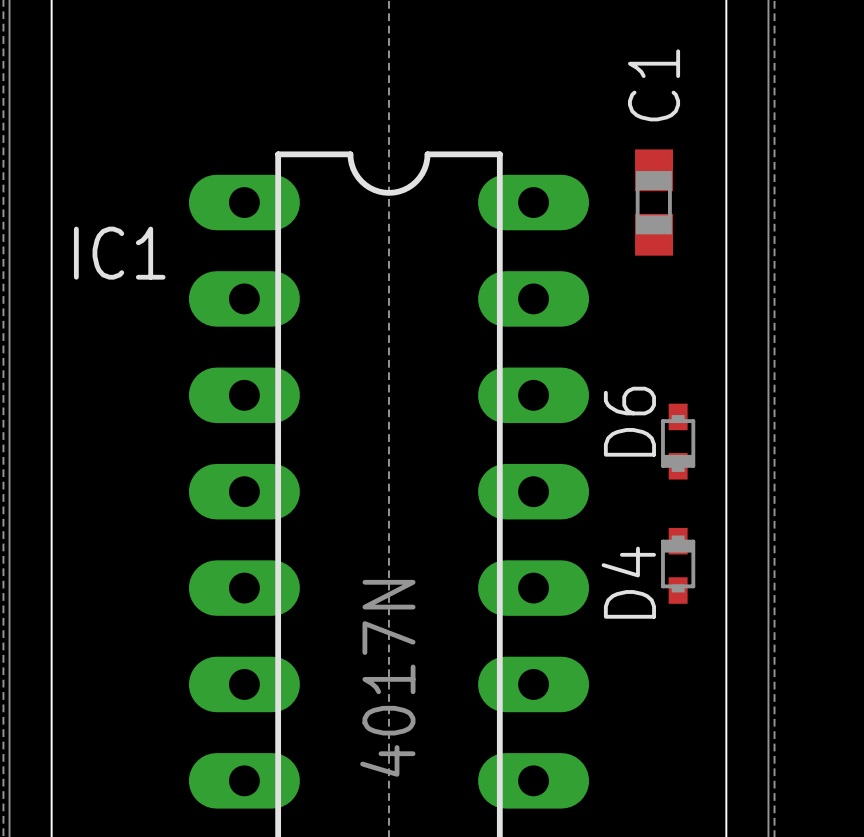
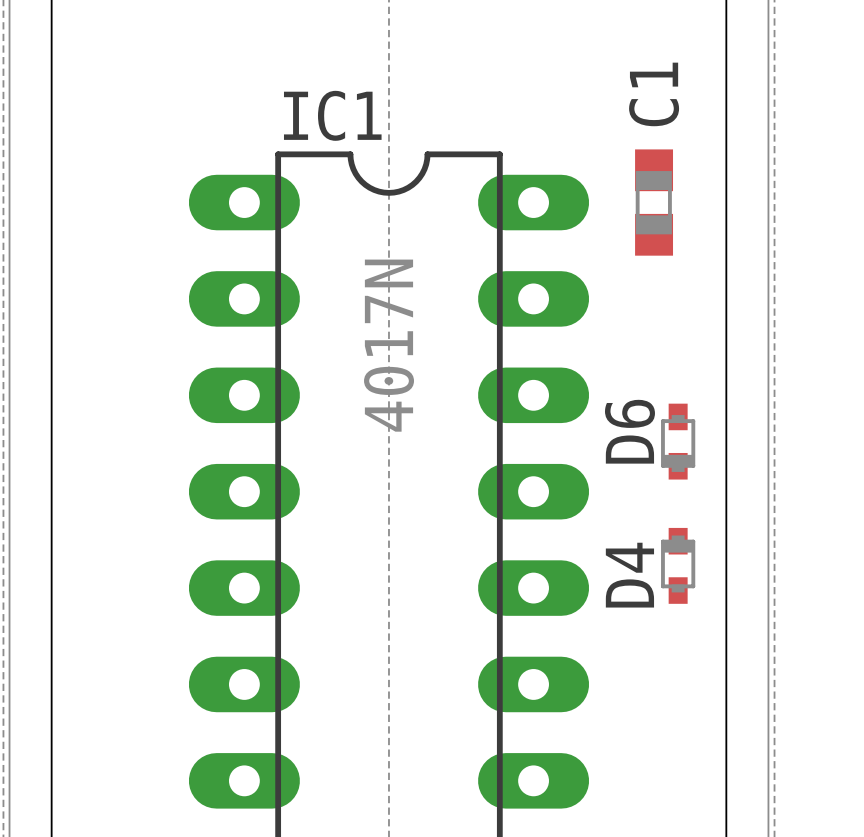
IC1 name position: IC1 (119, 253) -> IC1 (332, 115)
IC1 value position: 4017N (387, 678) -> 4017N (389, 345)

